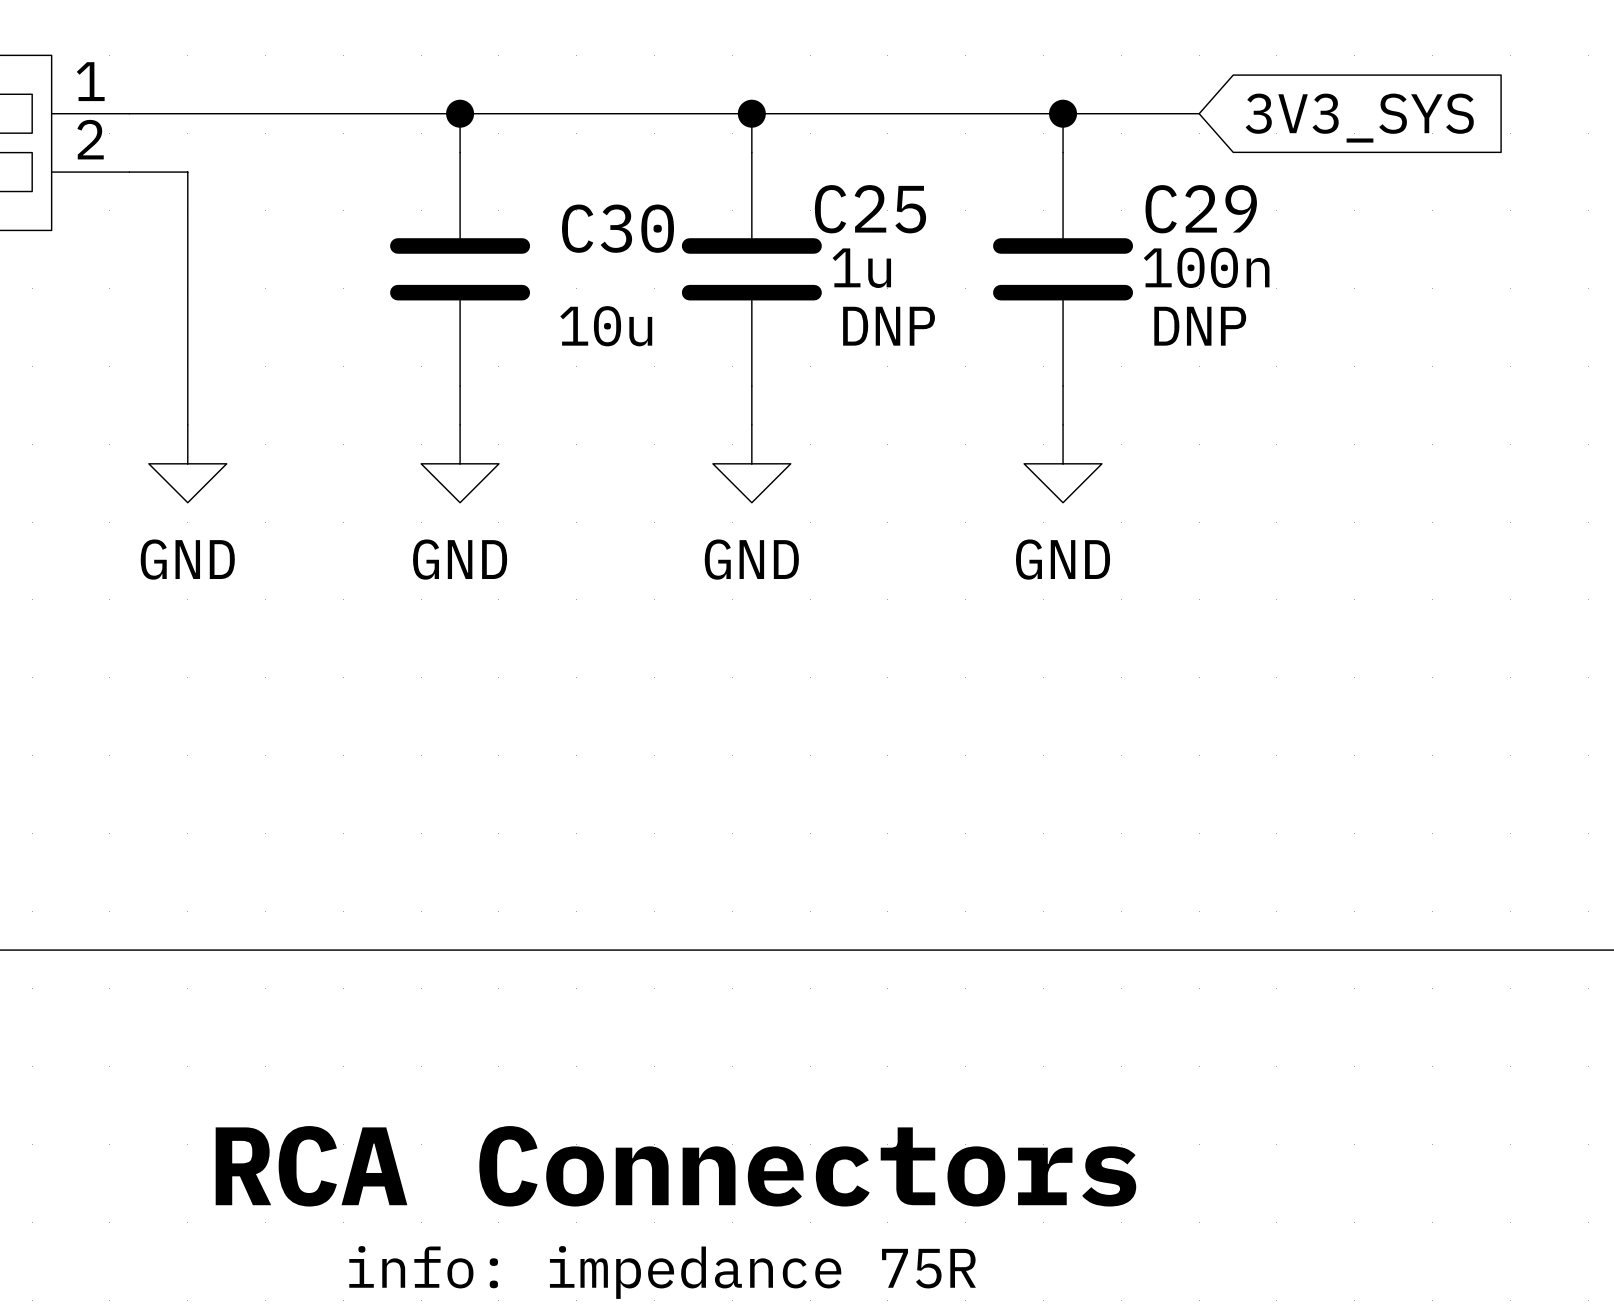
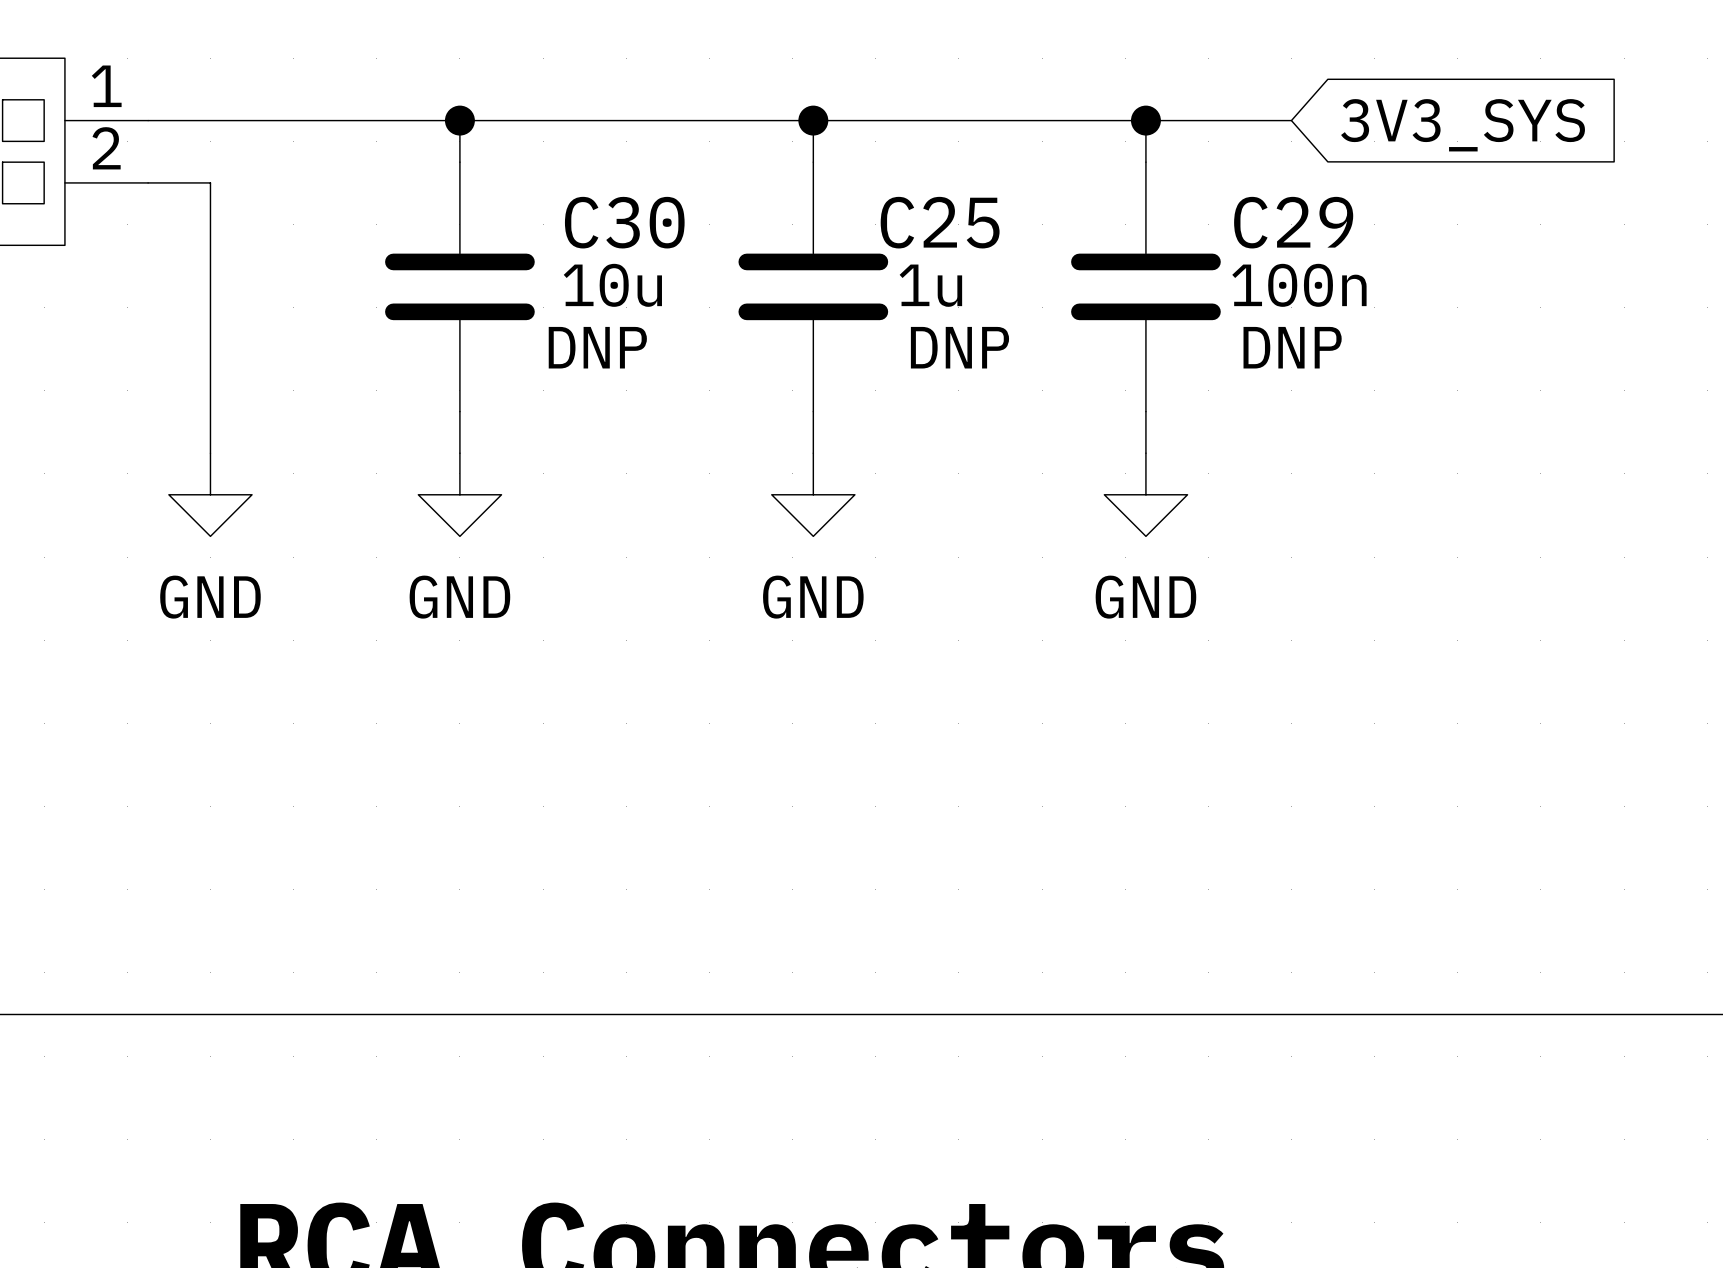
wire: (460, 113) (460, 152) -> (459, 120) (459, 162)
junction position: (460, 113) -> (459, 120)
C30 name position: C30 (618, 228) -> C30 (624, 222)
C30 position: (460, 269) -> (459, 286)
C30 text: none -> DNP (597, 347)
C30 text position: 10u (606, 326) -> 10u (612, 285)
wire: (460, 386) (460, 424) -> (459, 411) (459, 453)
power symbol position: GND (460, 463) -> GND (459, 494)

